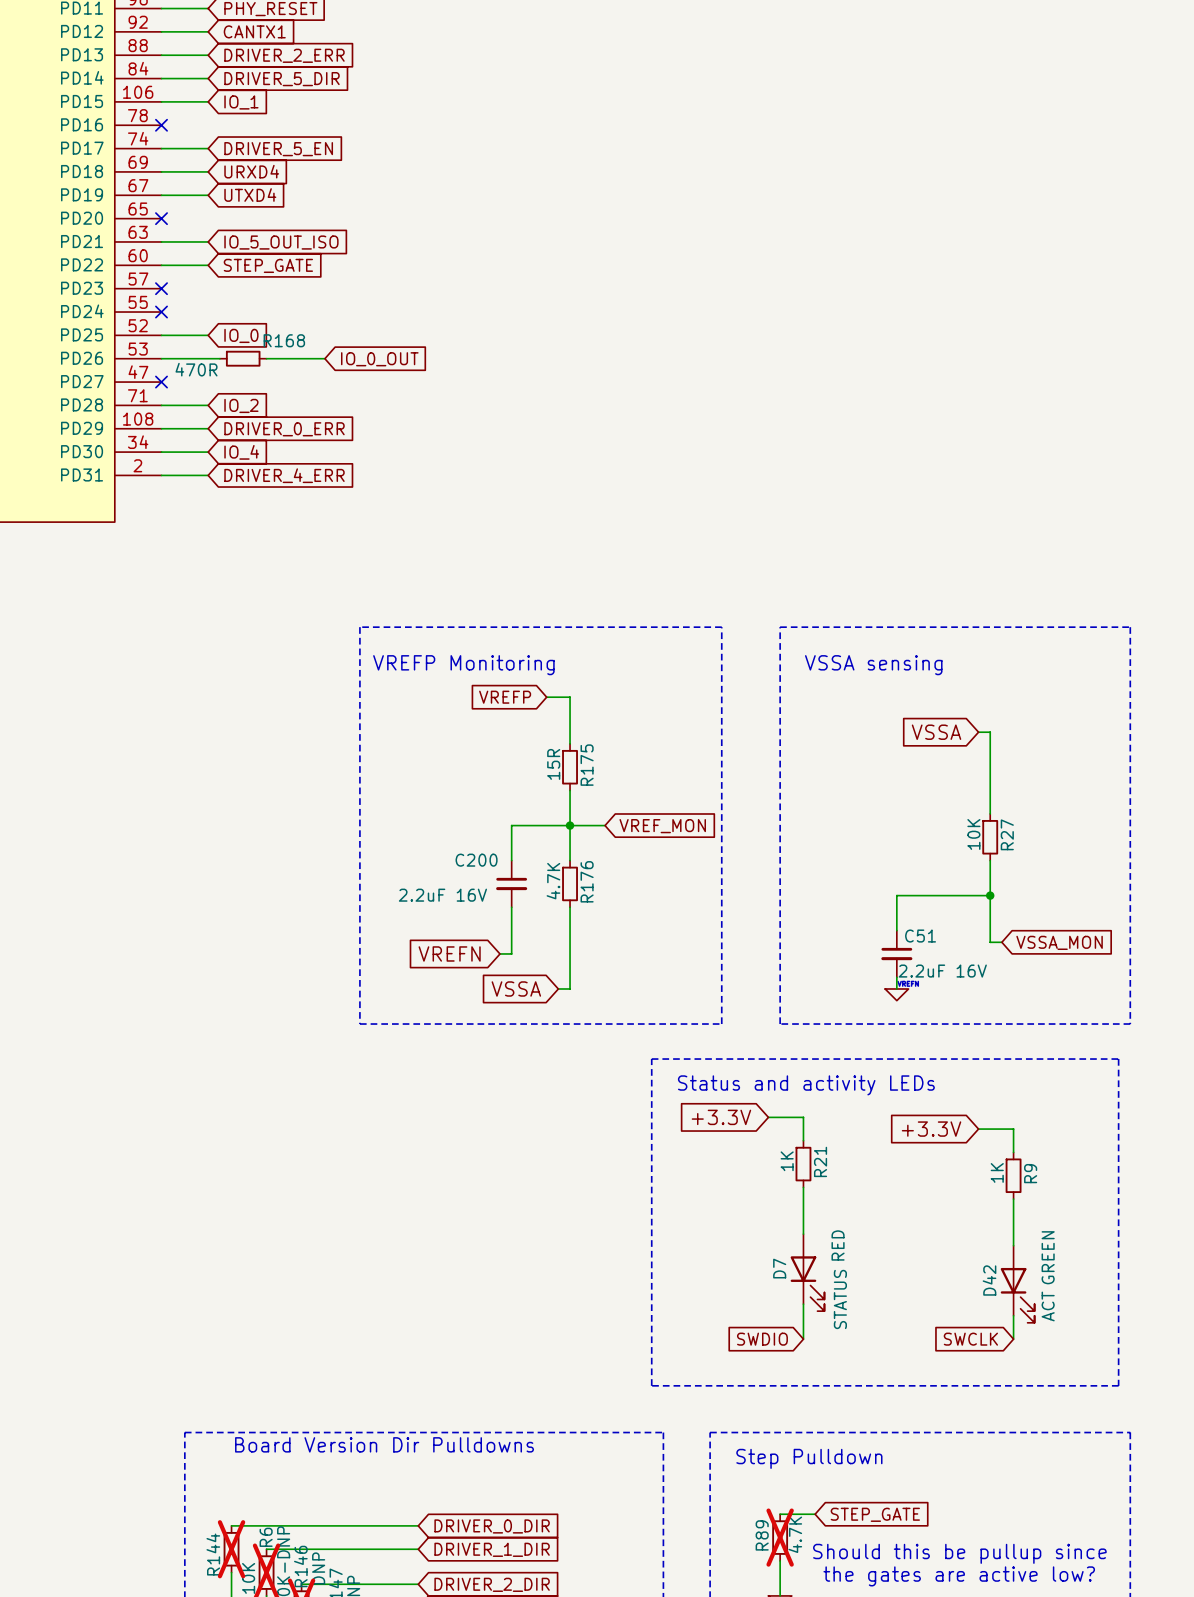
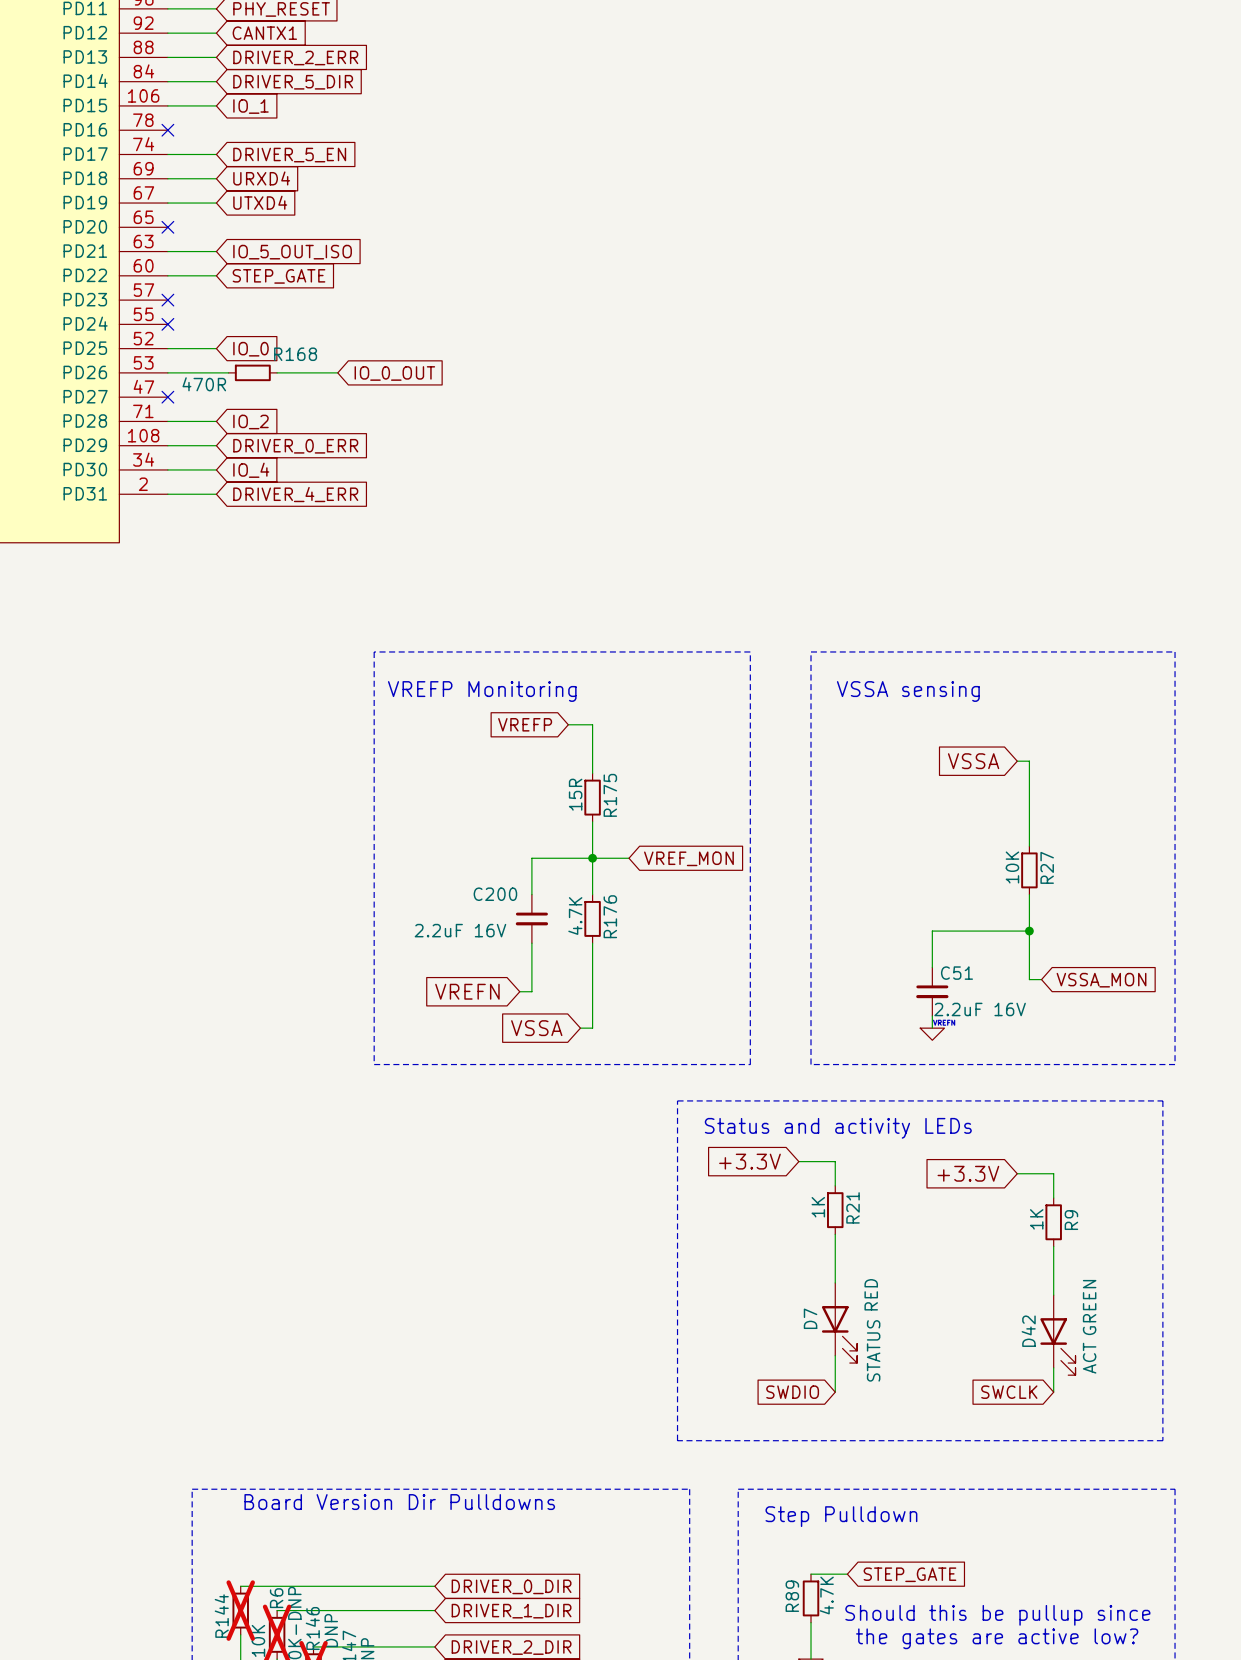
R89 do-not-place cross: (780, 1537) -> none

